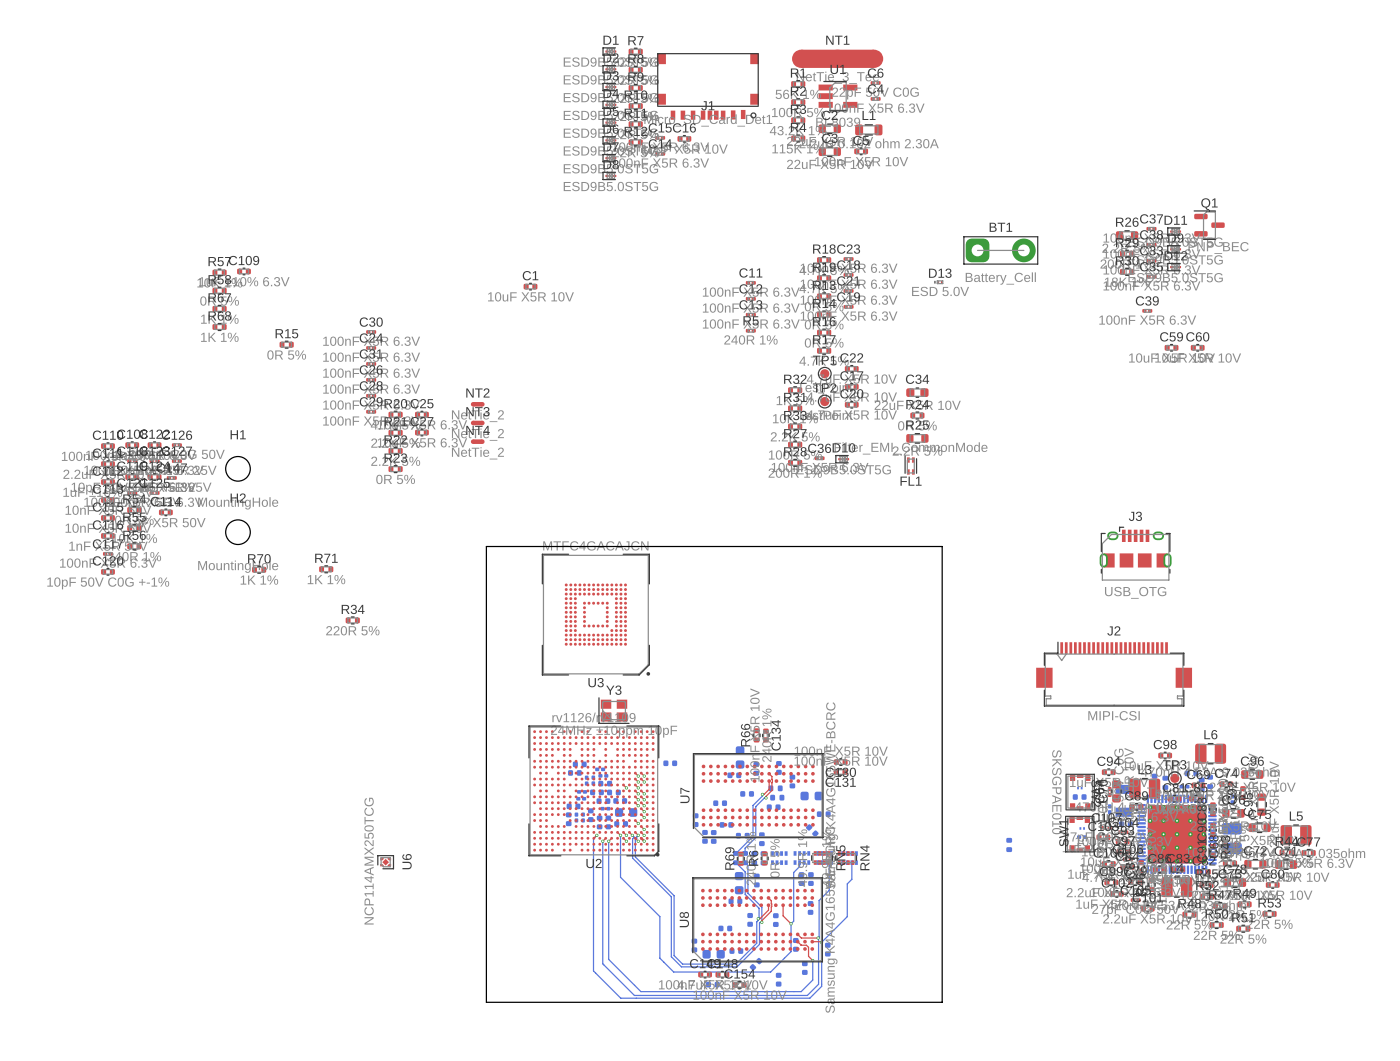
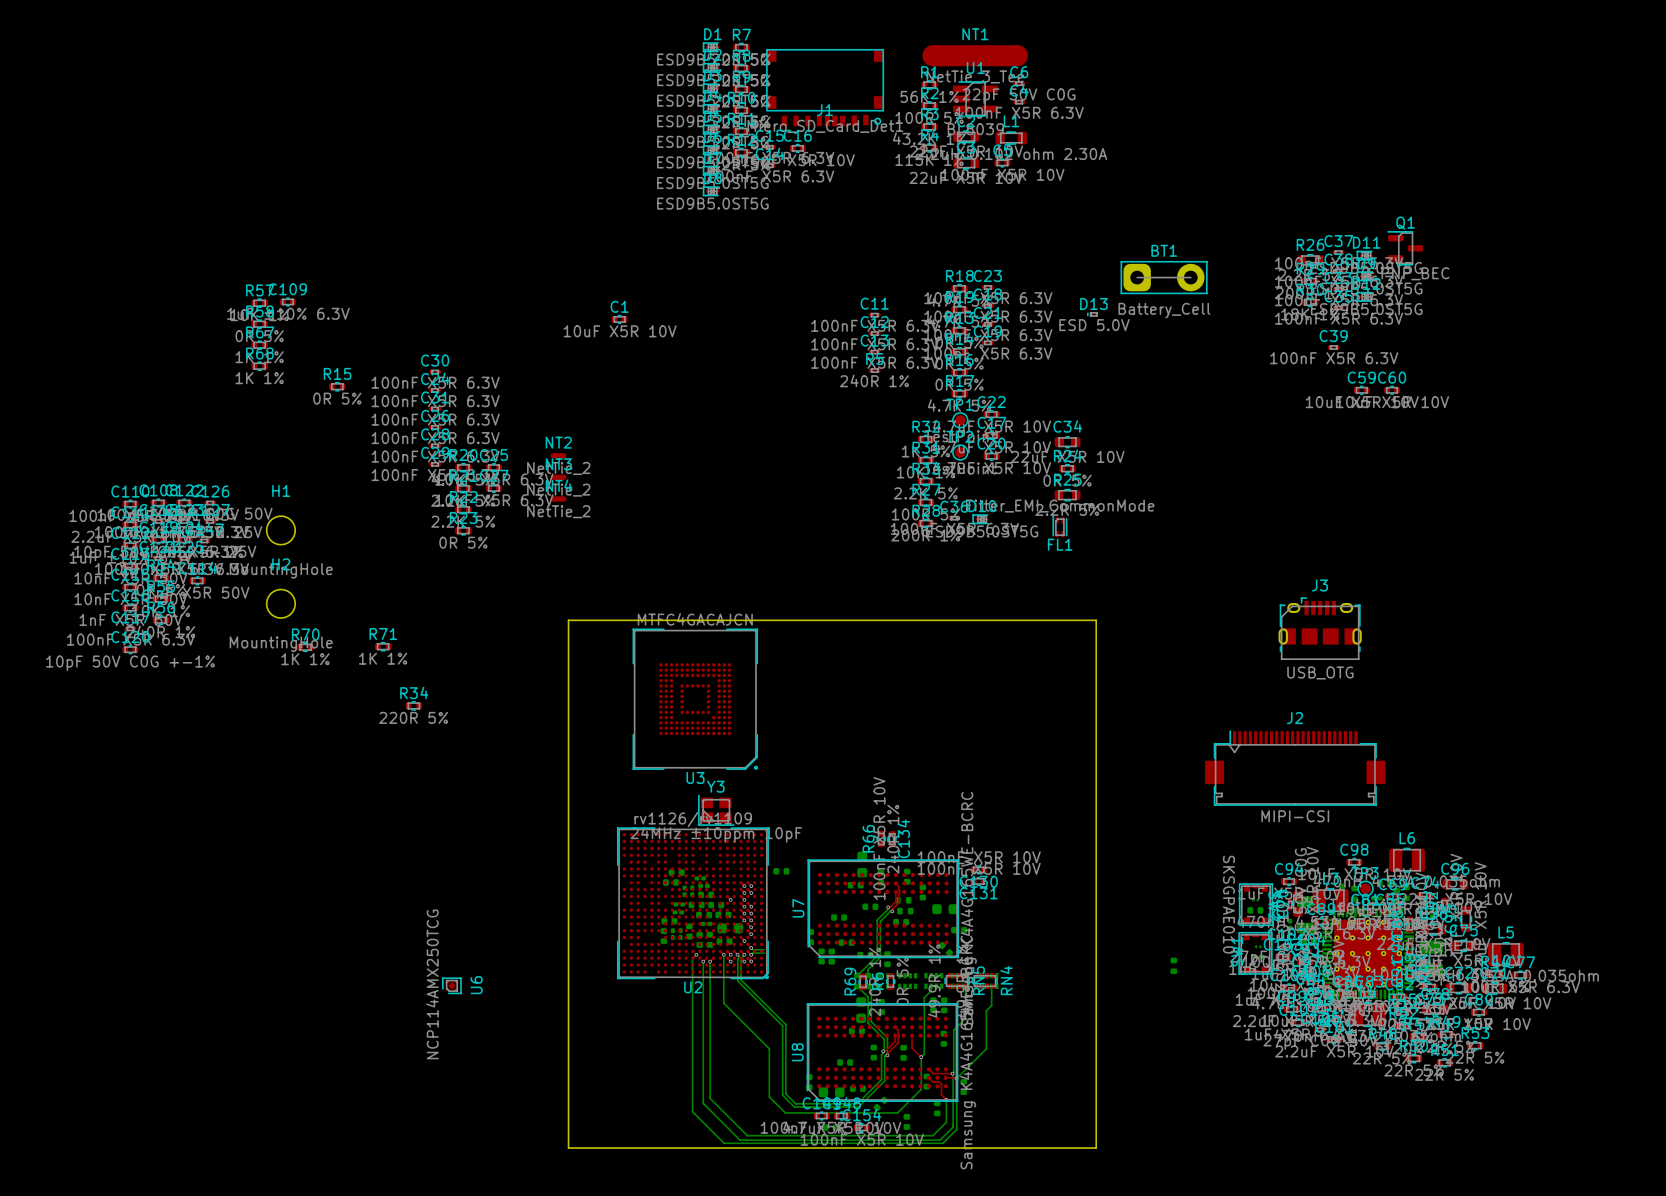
bottom track: none -> (751, 947) (753, 949) (764, 949)
bottom track: none -> (764, 953) (753, 953) (751, 954)

